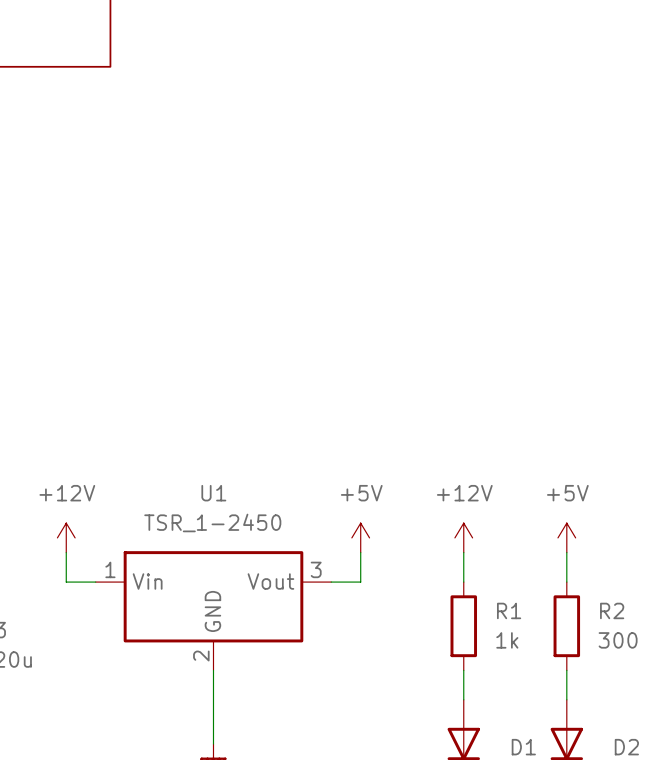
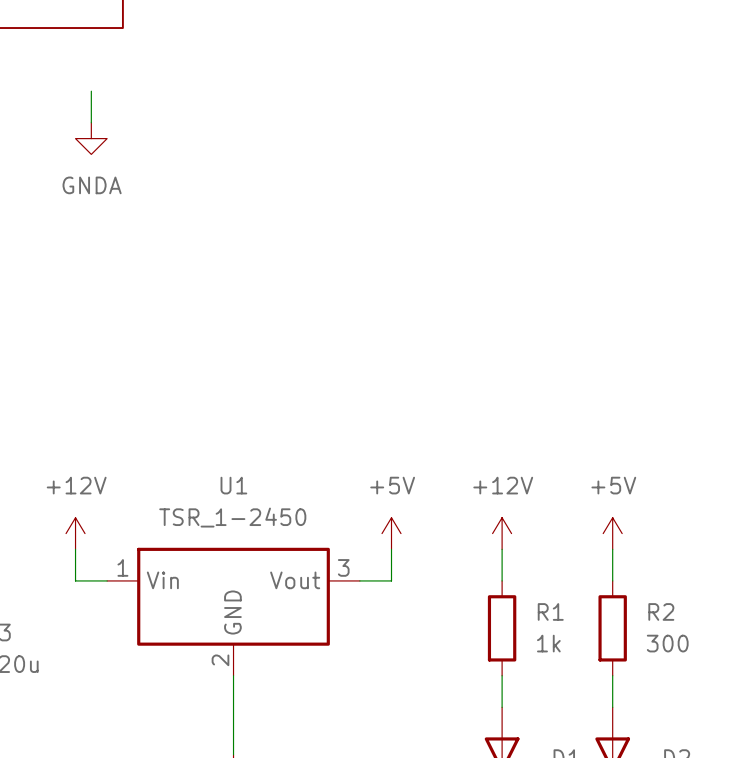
wire: none -> (91, 91) (91, 122)
power symbol: none -> GNDA (91, 138)

